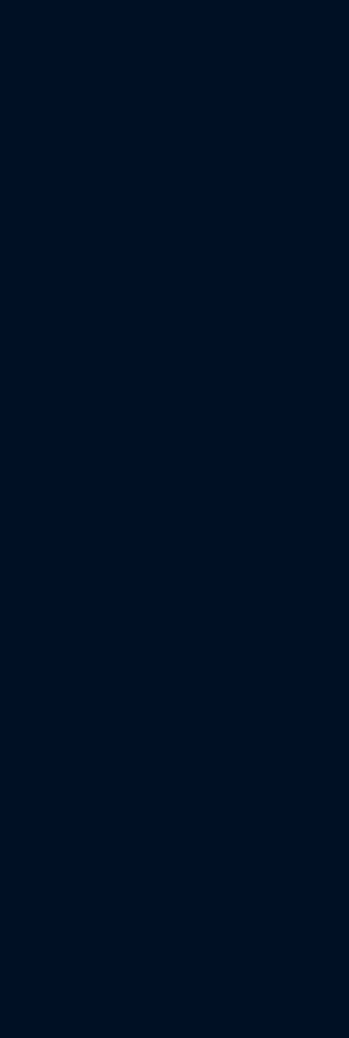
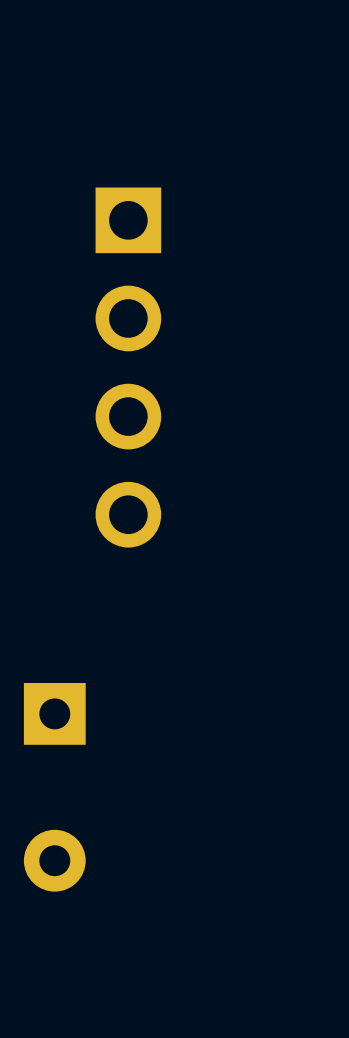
part: none -> (128, 367)
part: none -> (54, 787)

